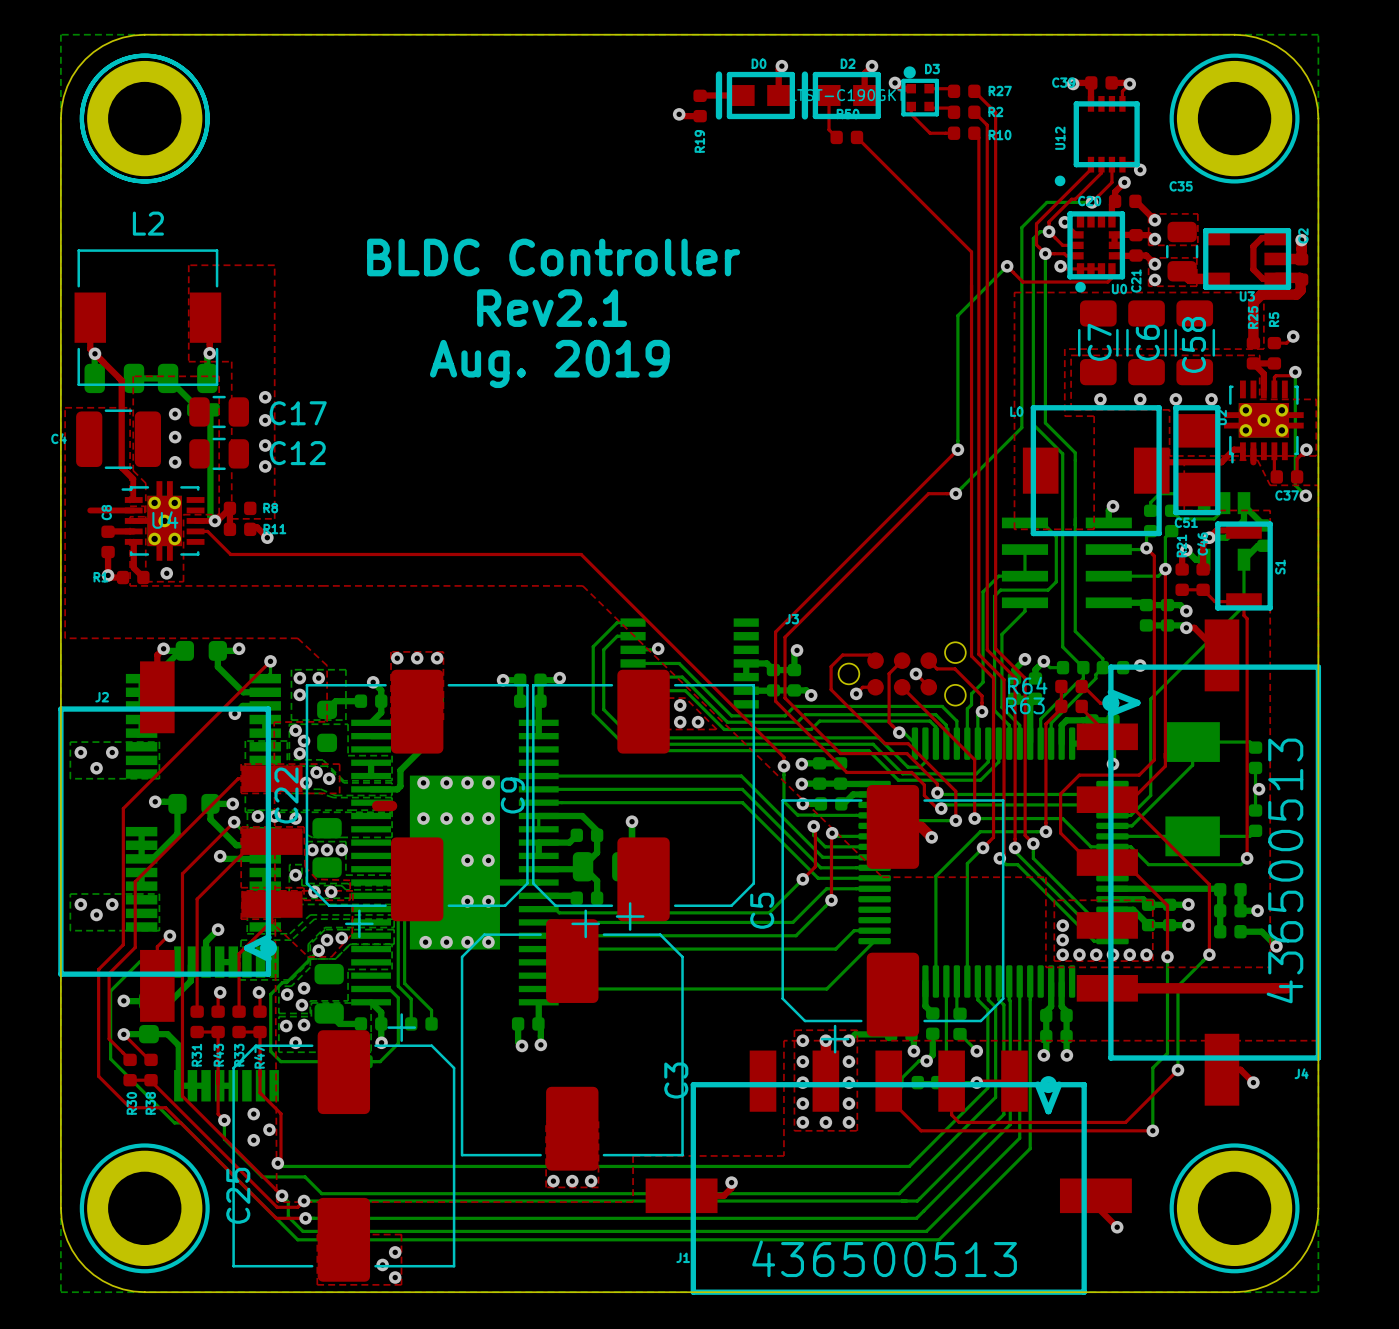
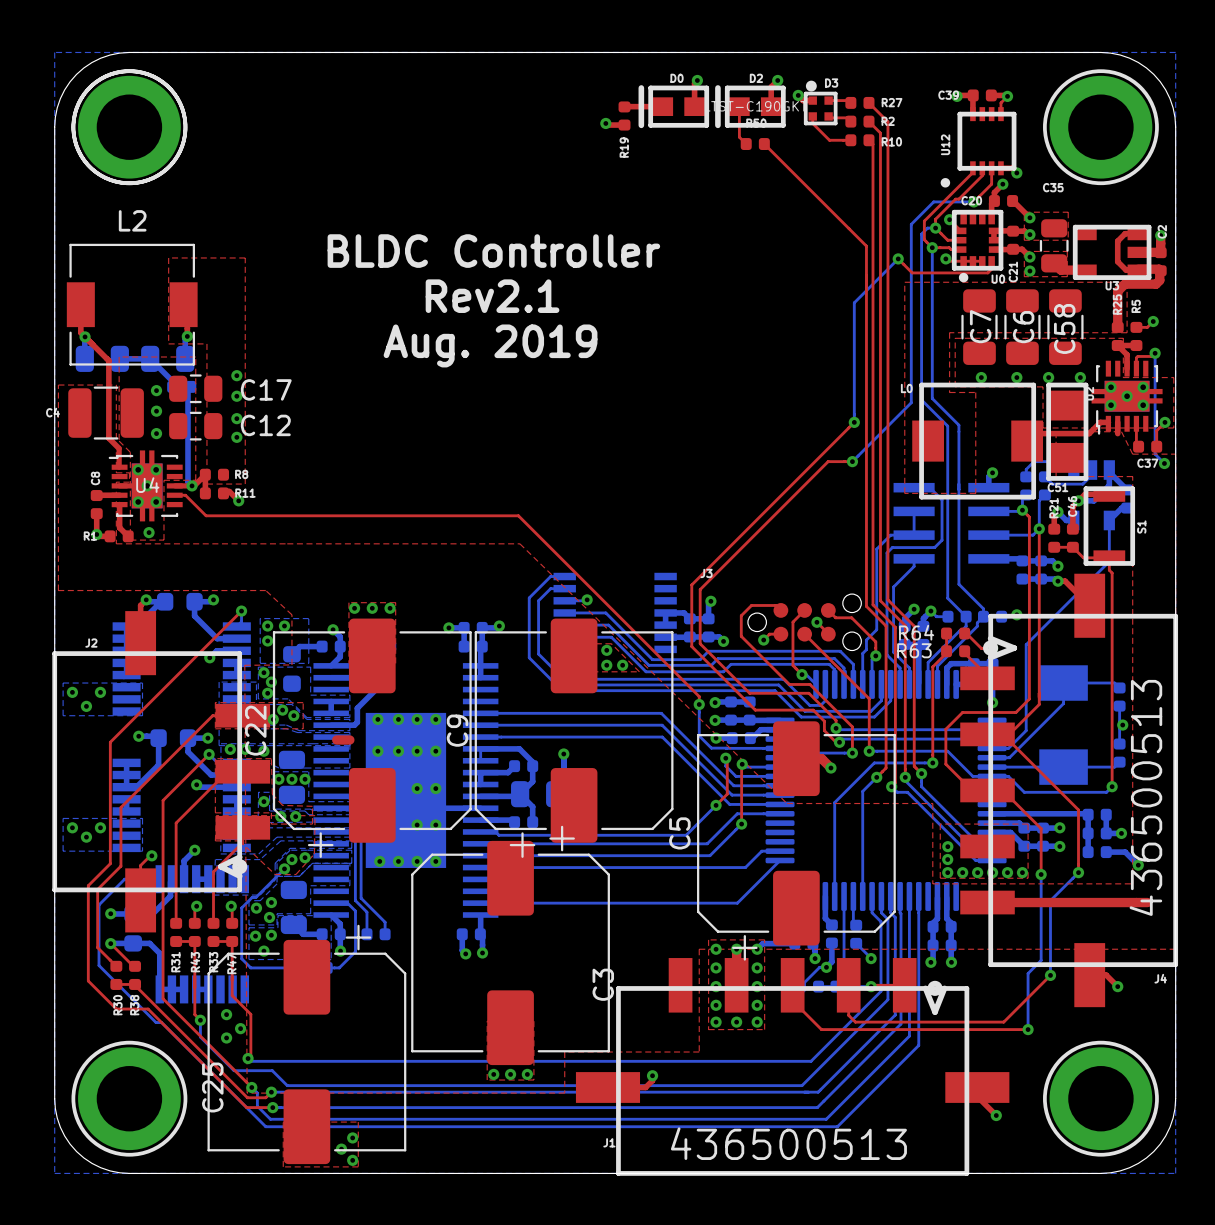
top track: (90, 510) (133, 510) -> none

